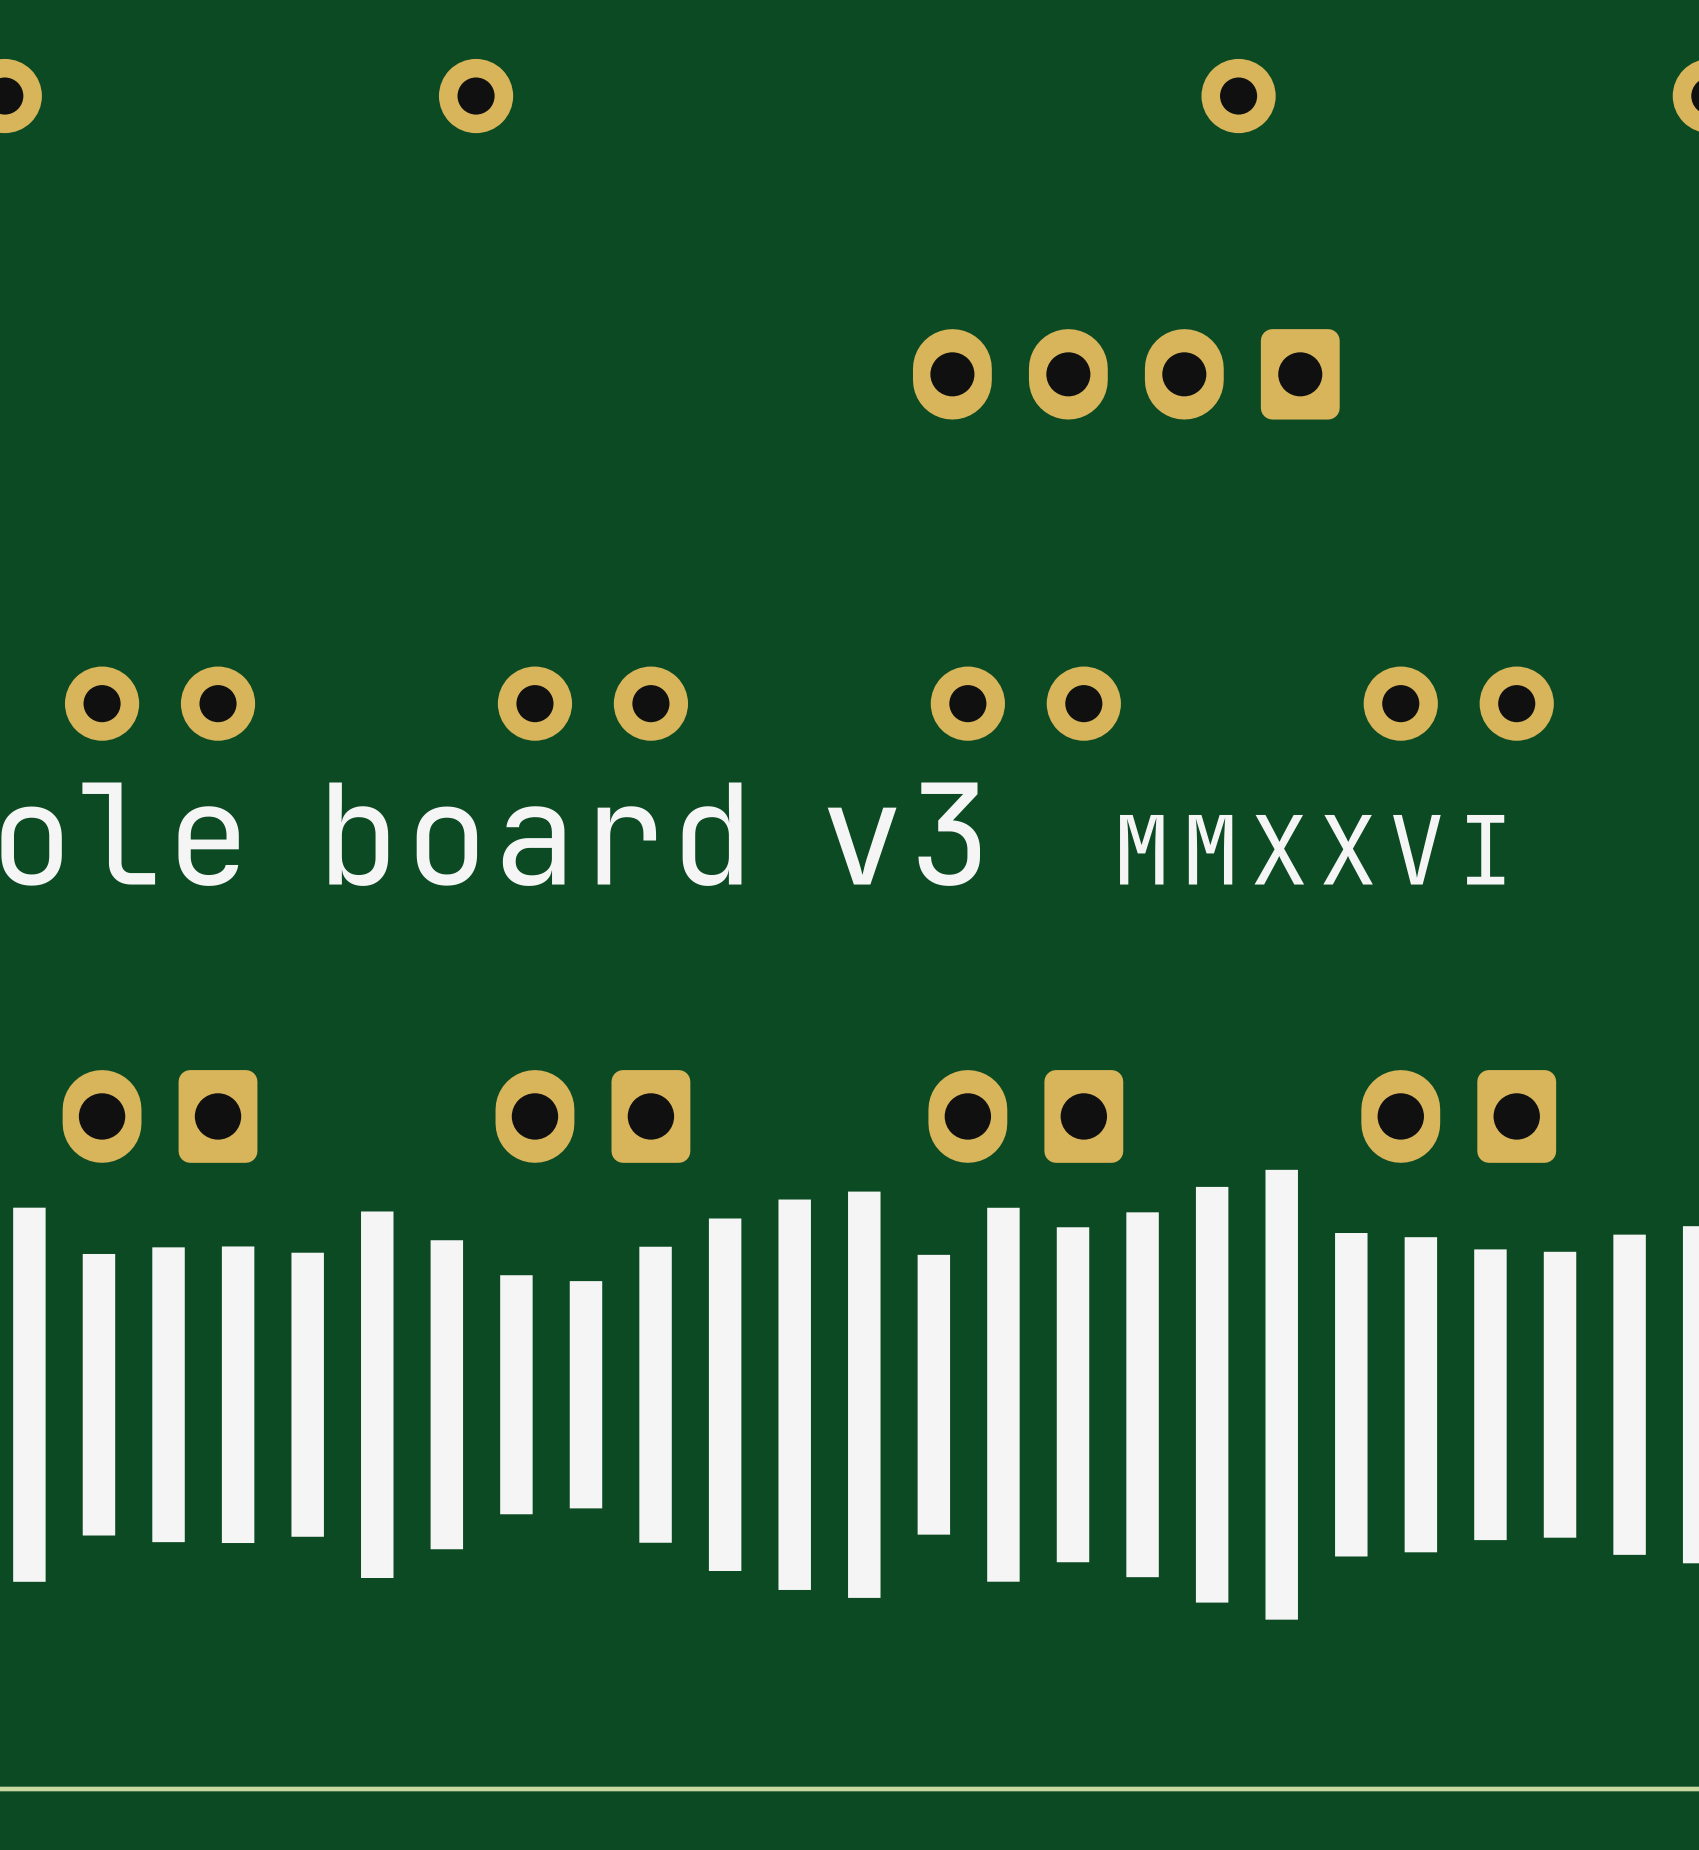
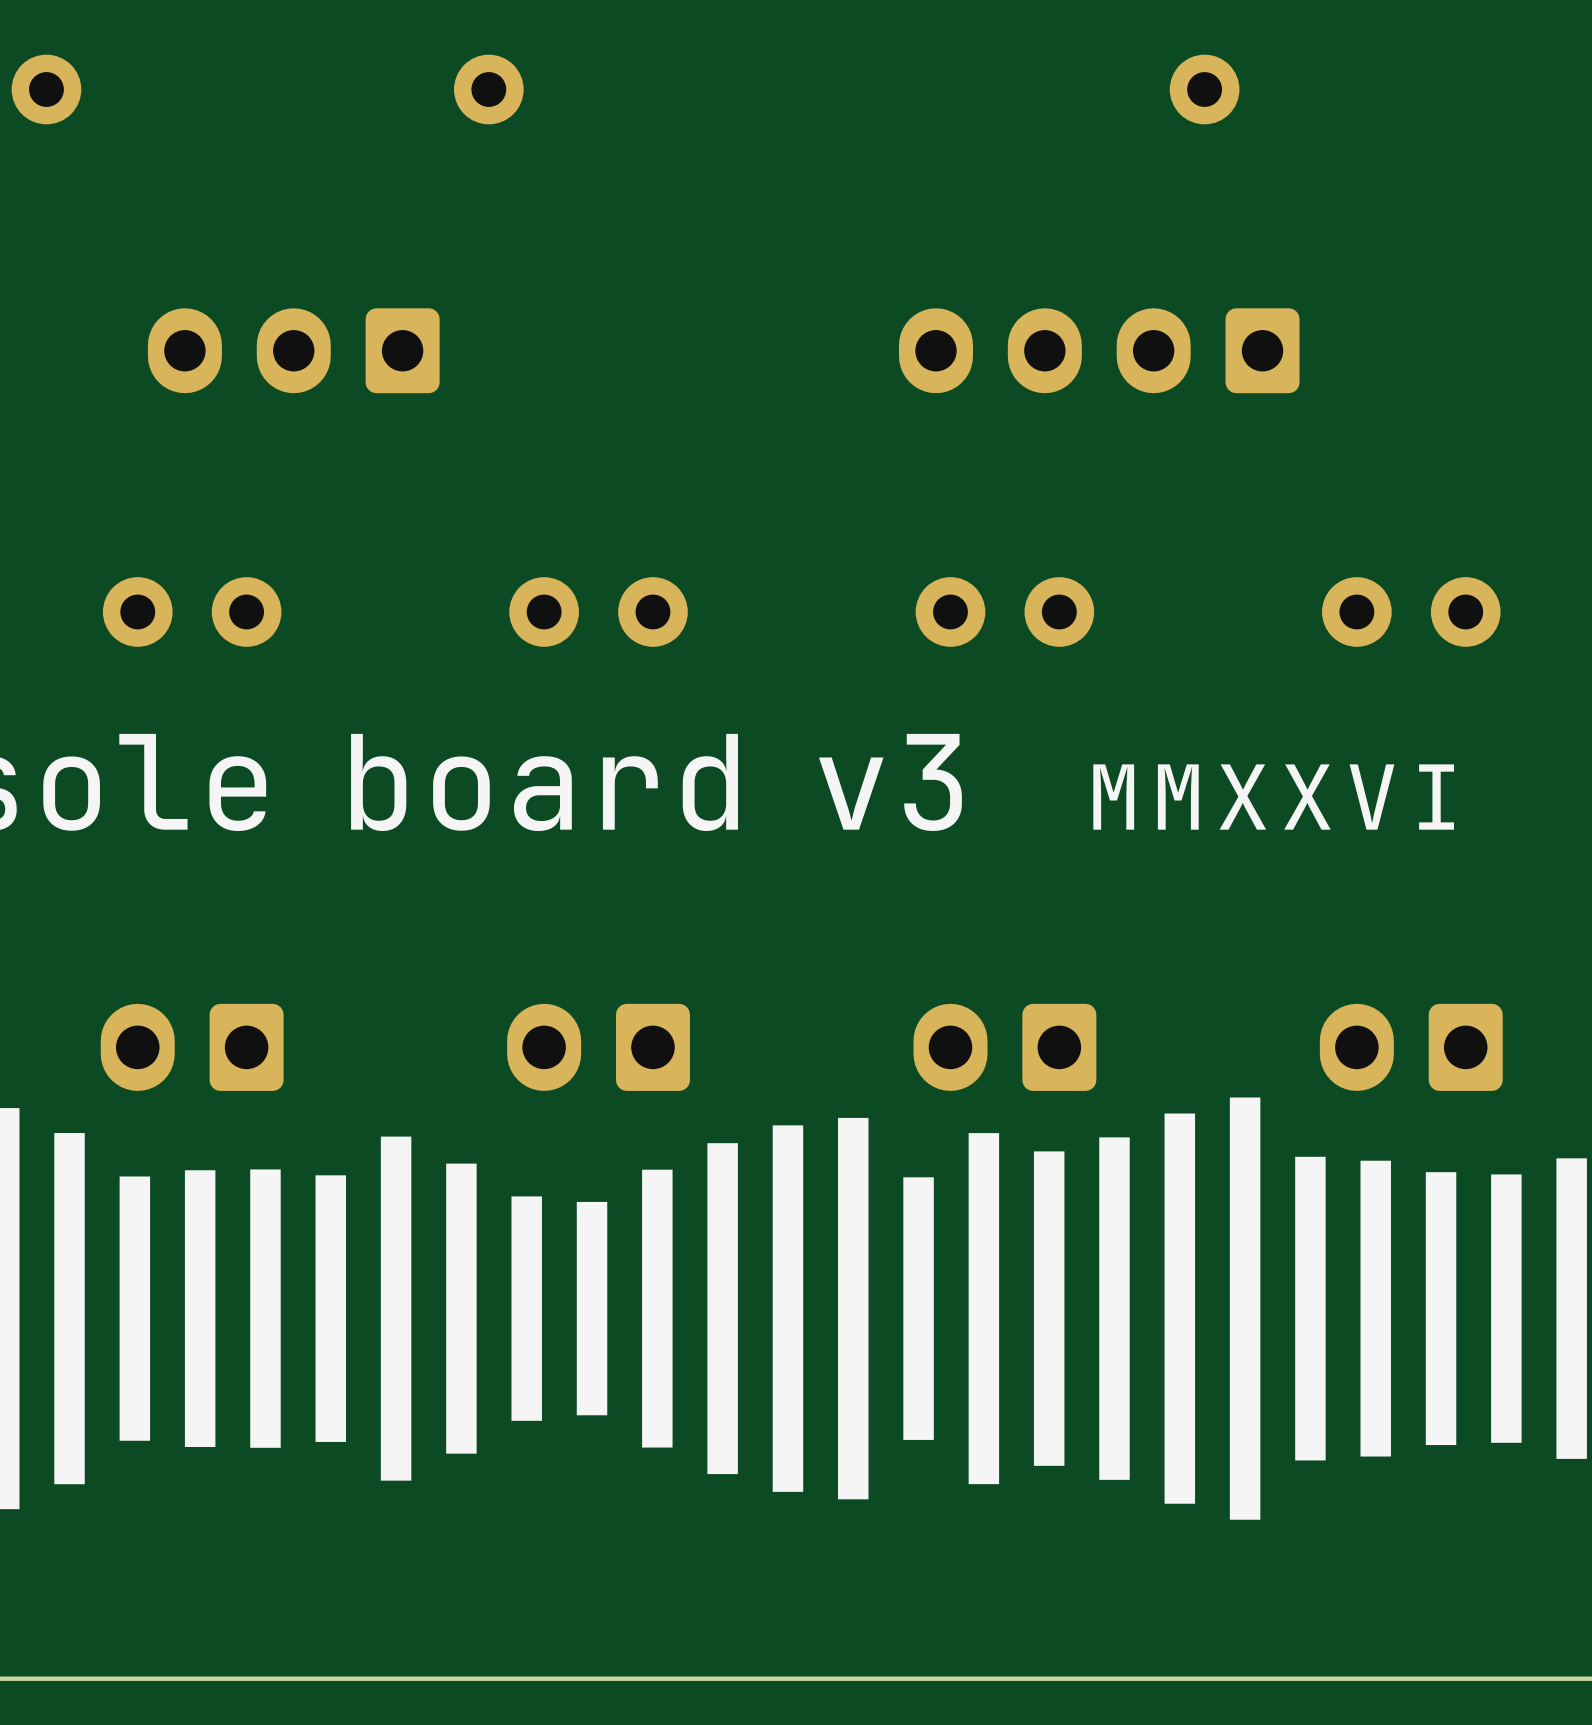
part: none -> (293, 350)
part position: (160, 703) -> (192, 611)
part position: (592, 703) -> (598, 611)
part position: (1025, 703) -> (1004, 611)
part position: (1458, 703) -> (1411, 611)

